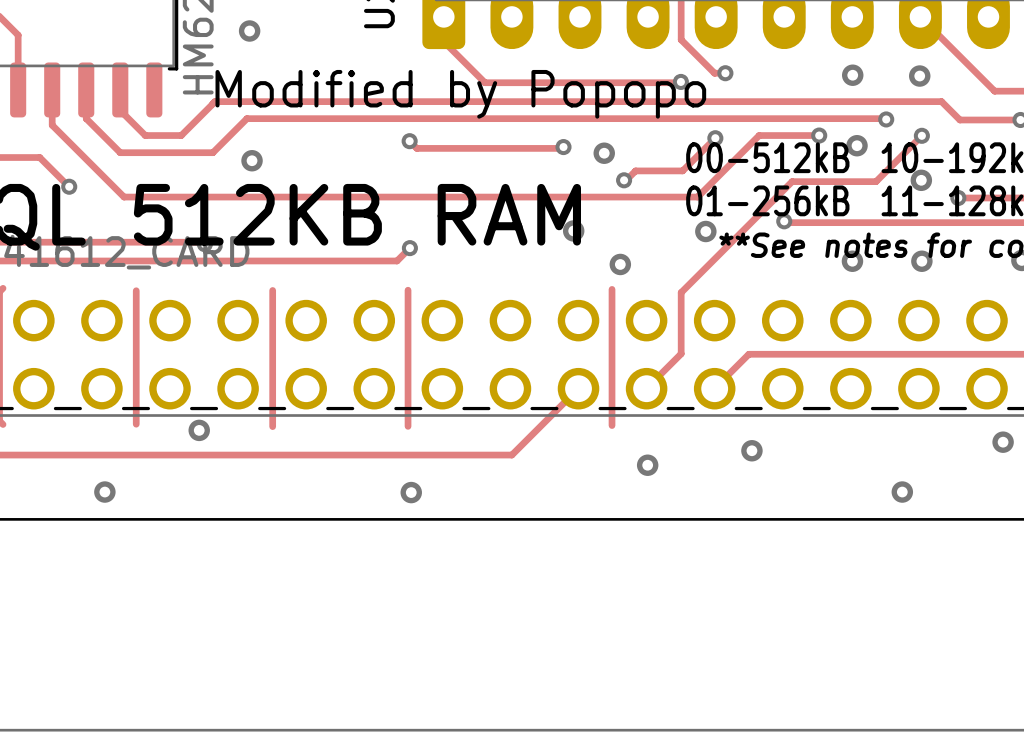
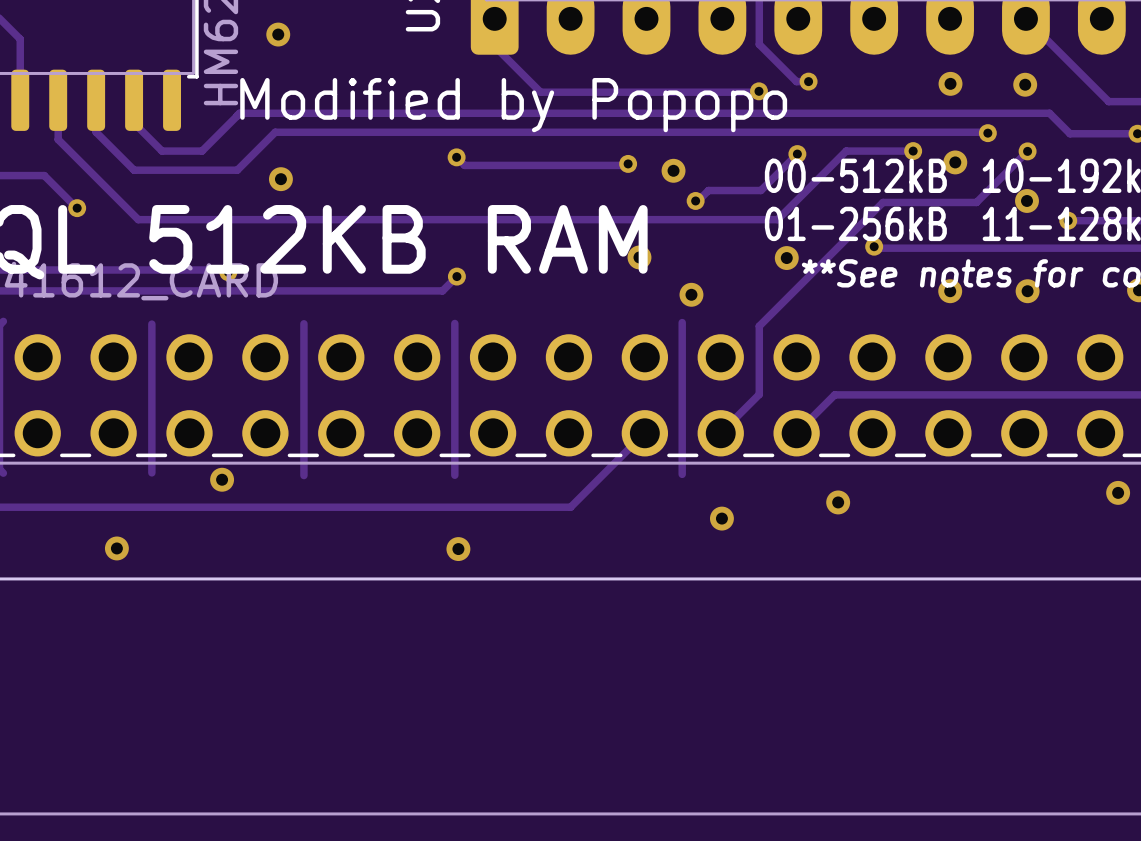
via: (902, 492) -> none

